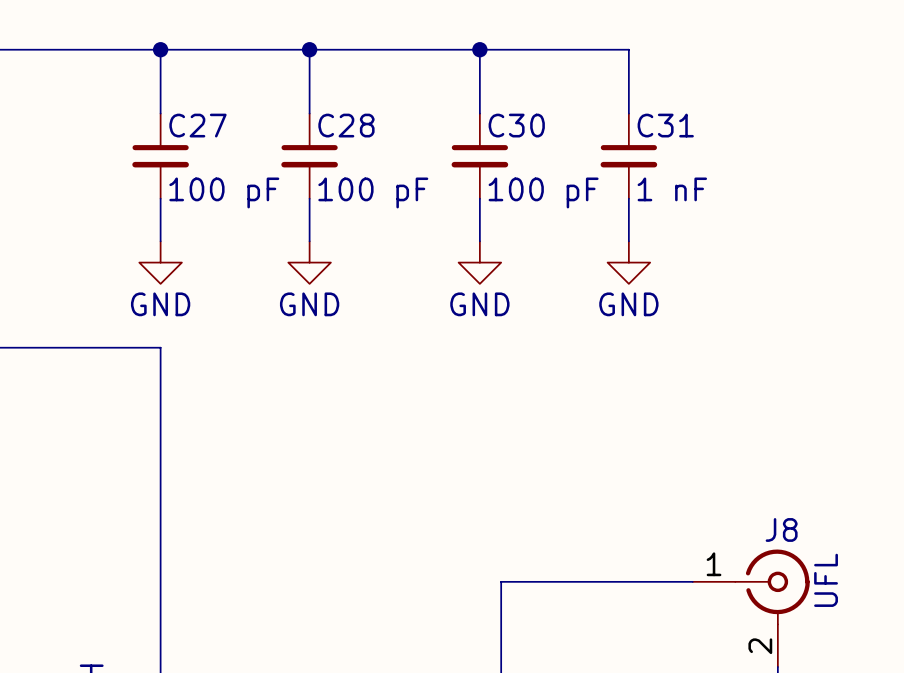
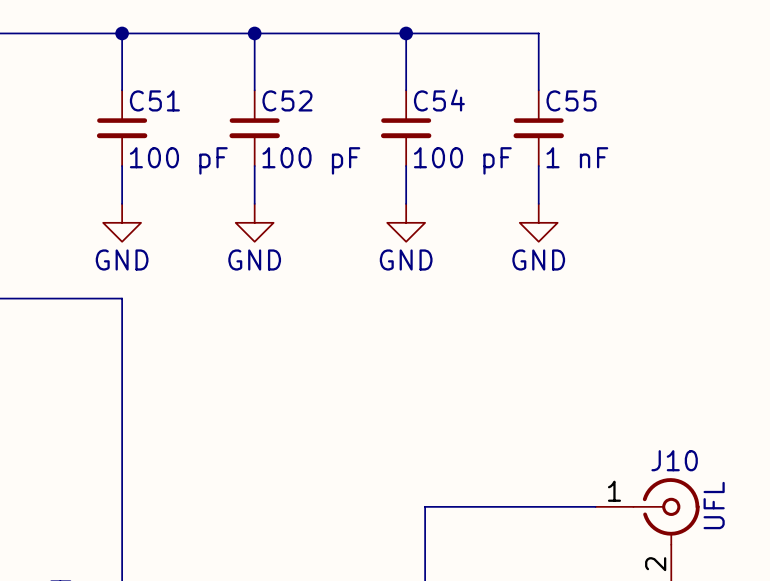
C27 name: C27 (197, 125) -> C51 (154, 100)
C28 name: C28 (346, 125) -> C52 (287, 100)
C30 name: C30 (516, 125) -> C54 (439, 100)
C31 name: C31 (665, 125) -> C55 (571, 100)
J8 name: J8 (781, 529) -> J10 (674, 460)

